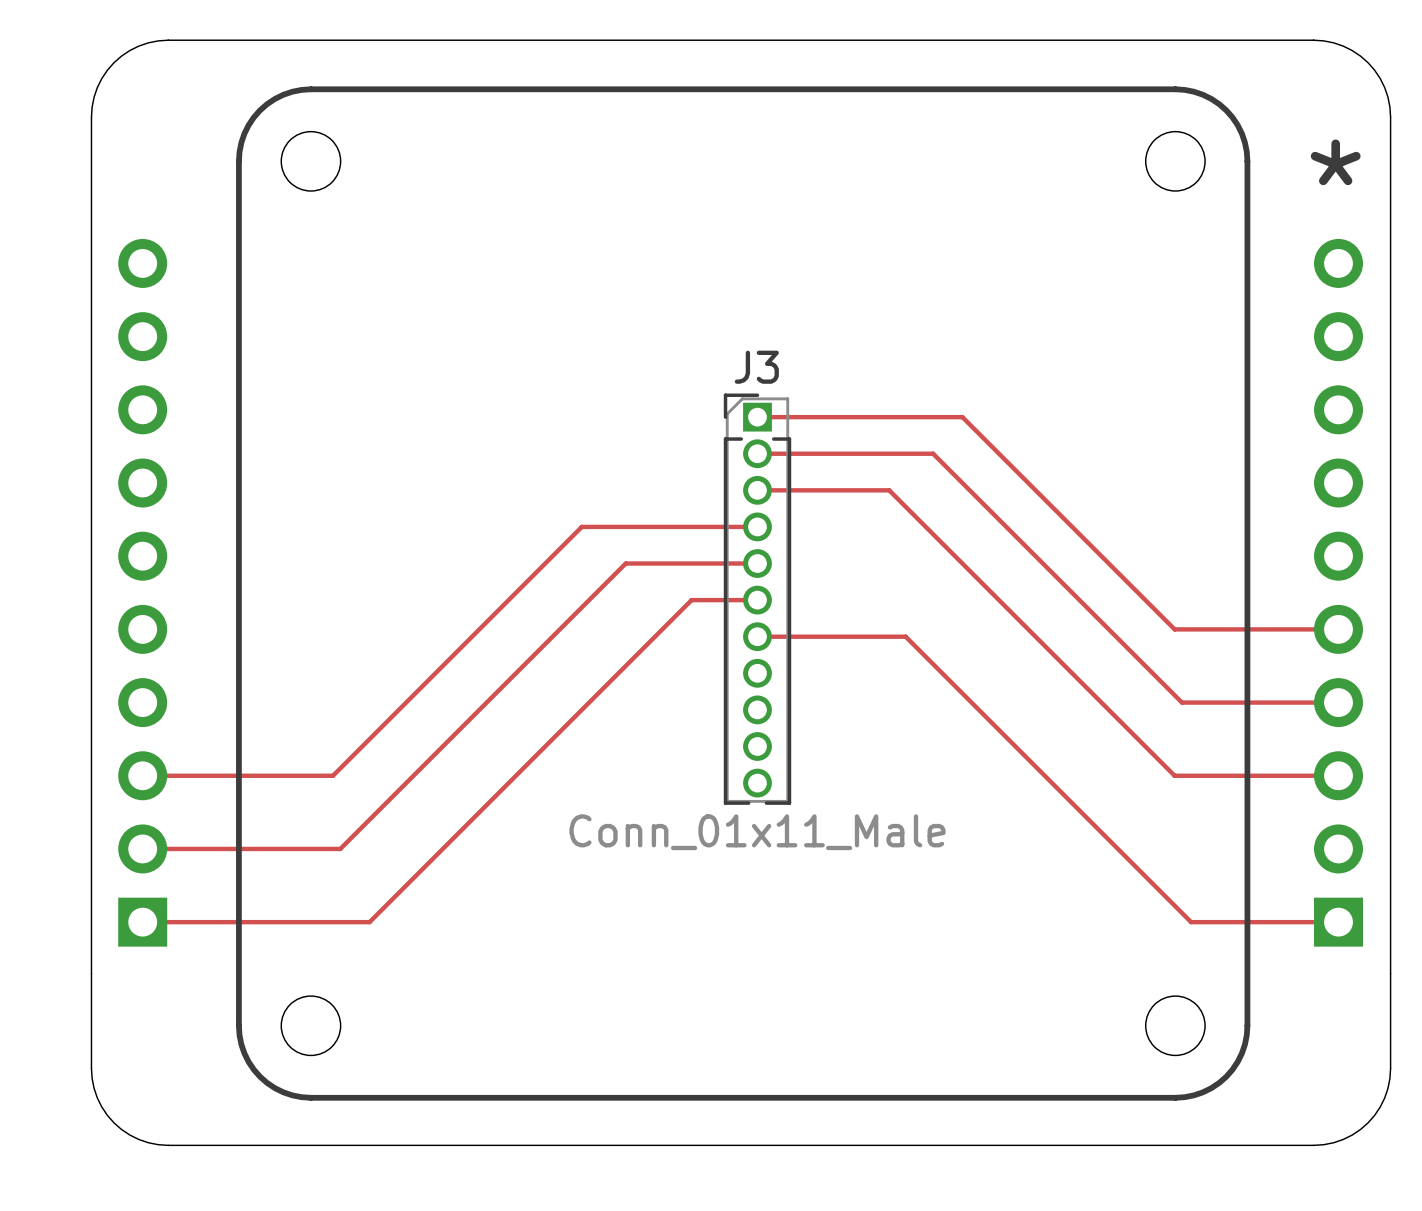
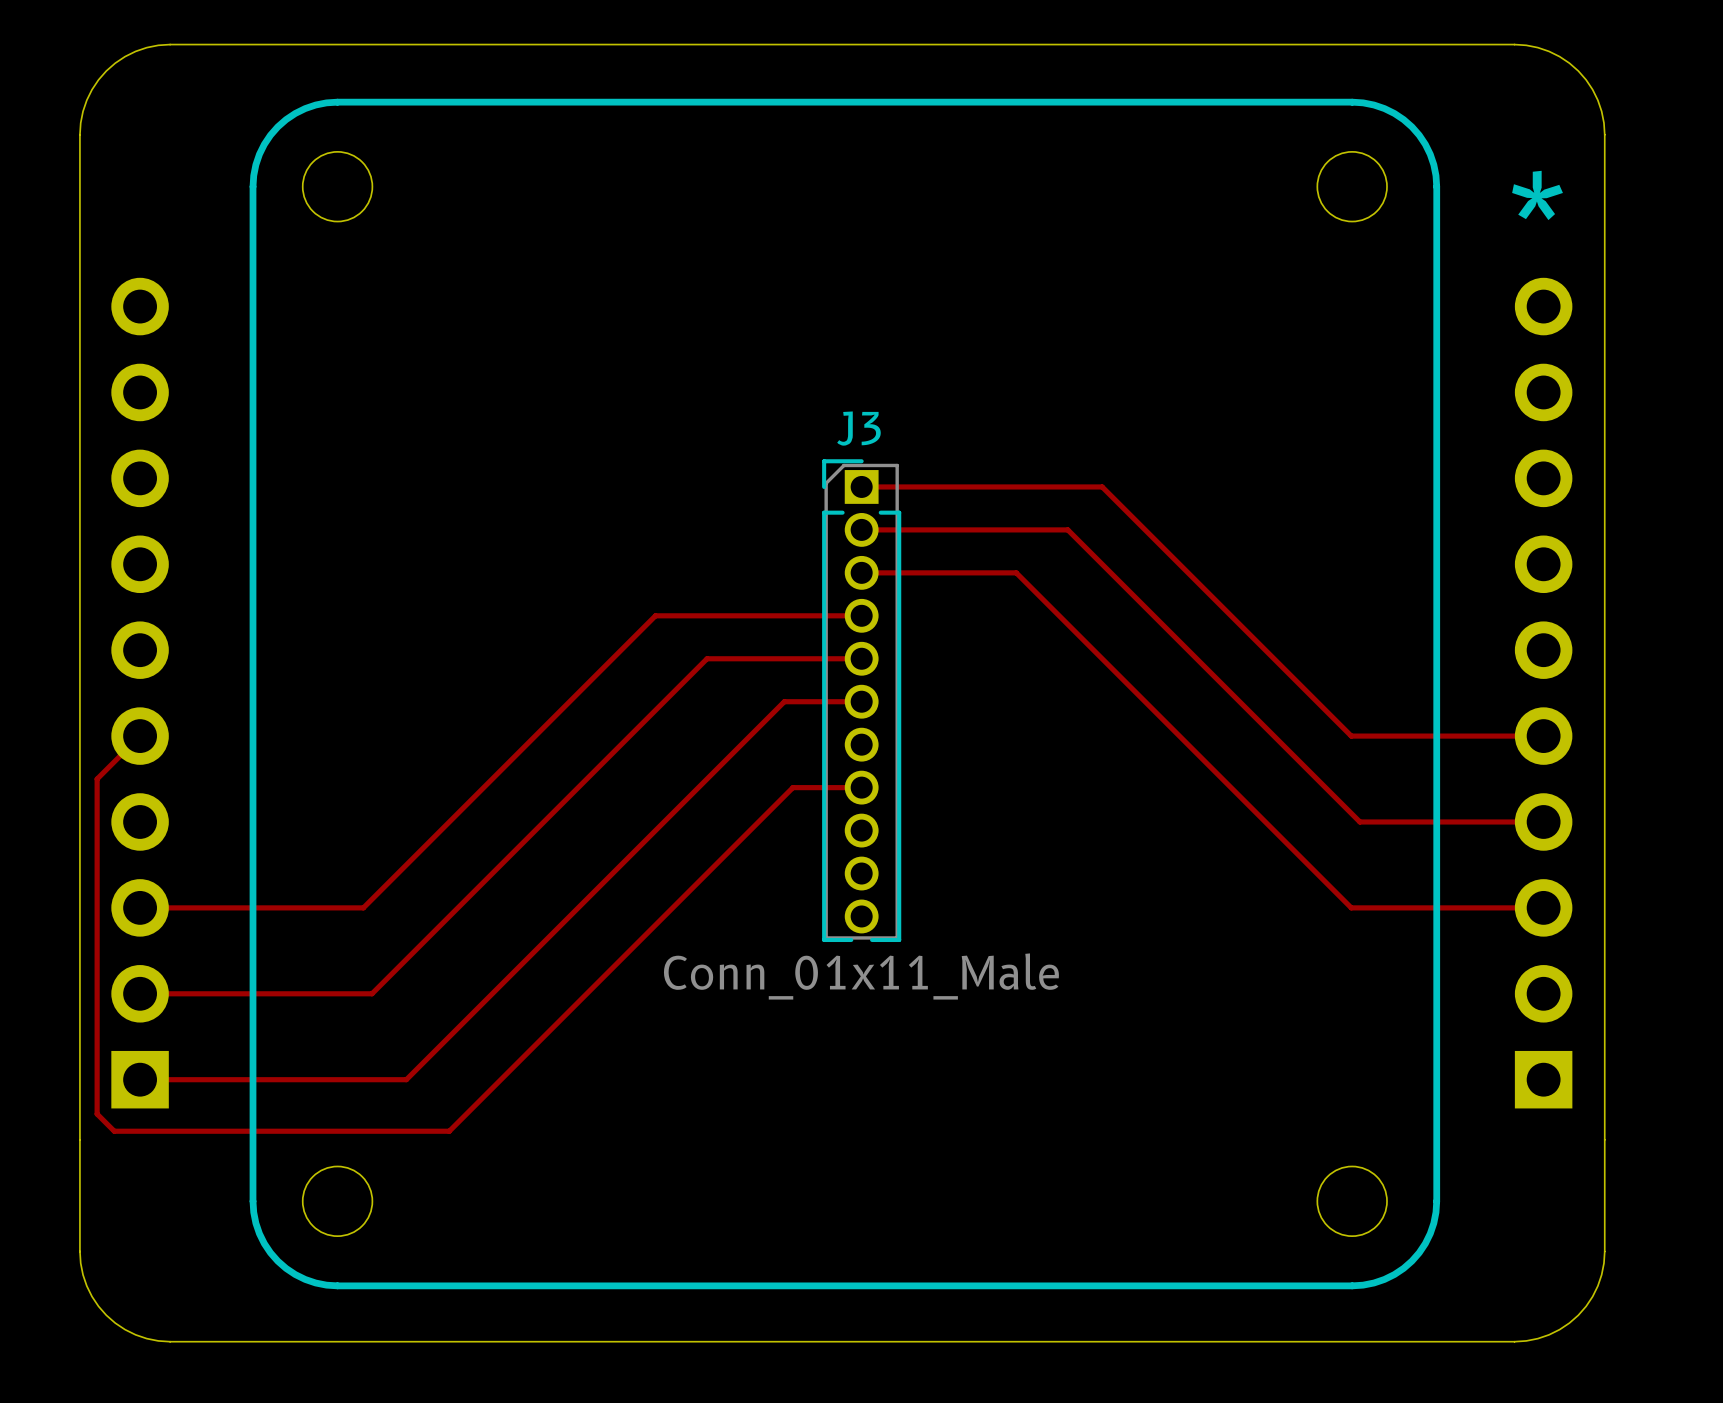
track: none -> (140, 736) (97, 779) (97, 1114) (114, 1131) (449, 1131) (792, 787) (861, 787)
track: (757, 636) (905, 636) (1191, 922) (1338, 922) -> none

